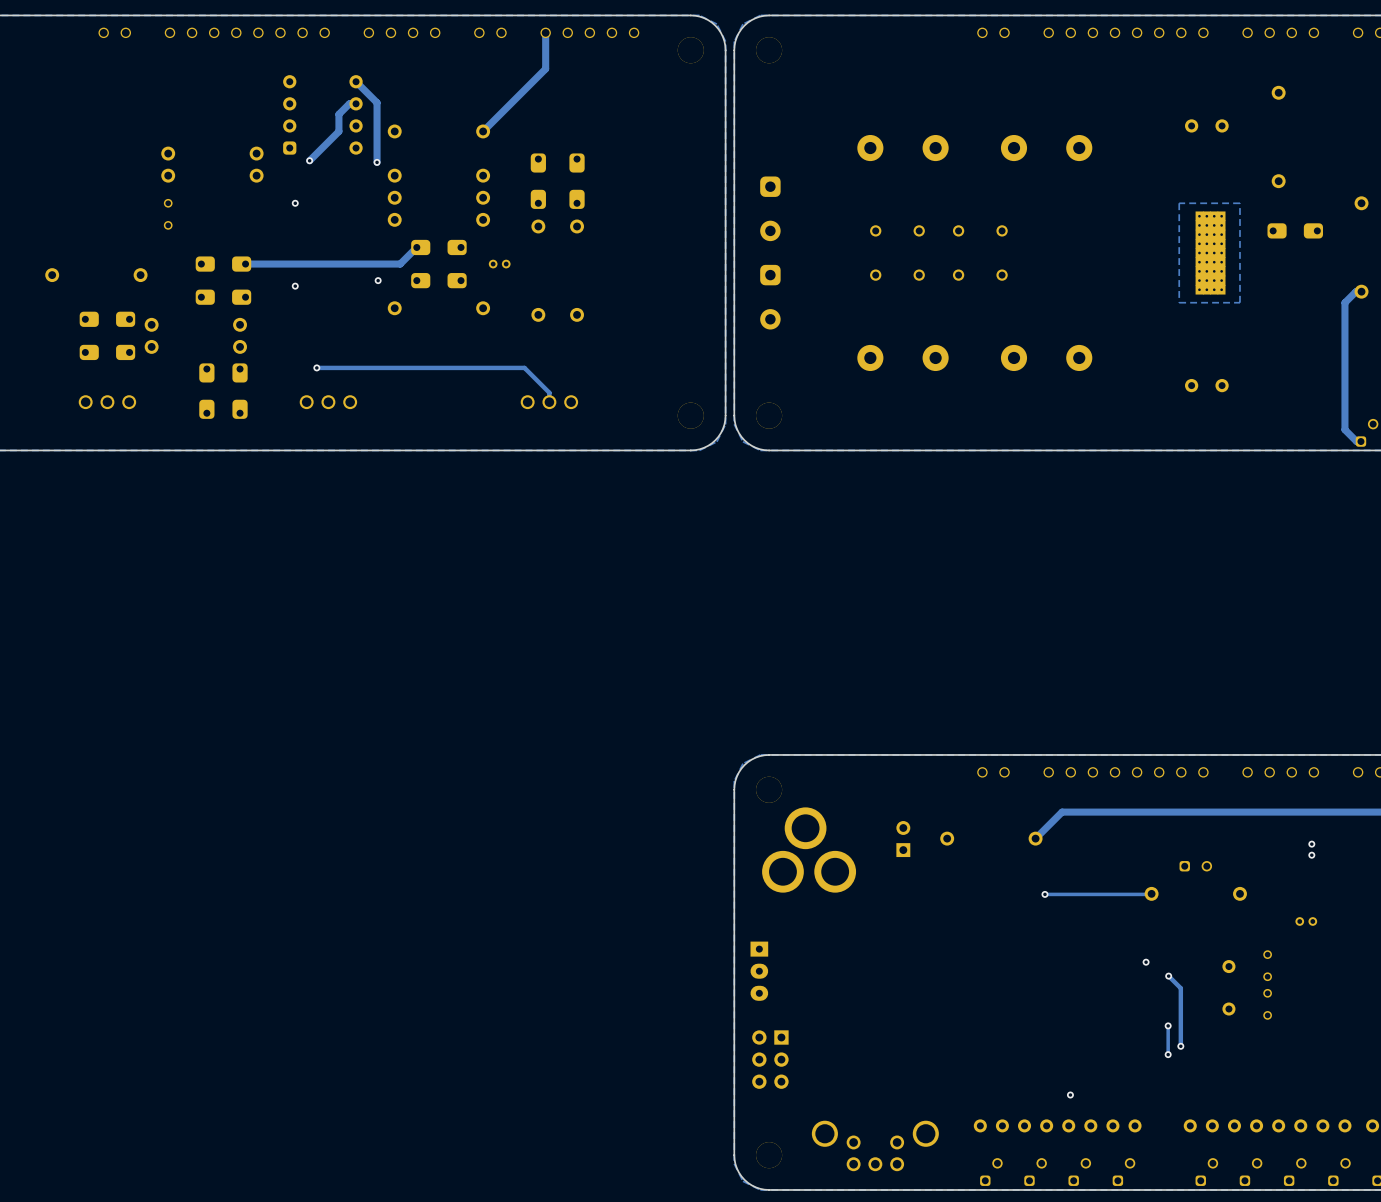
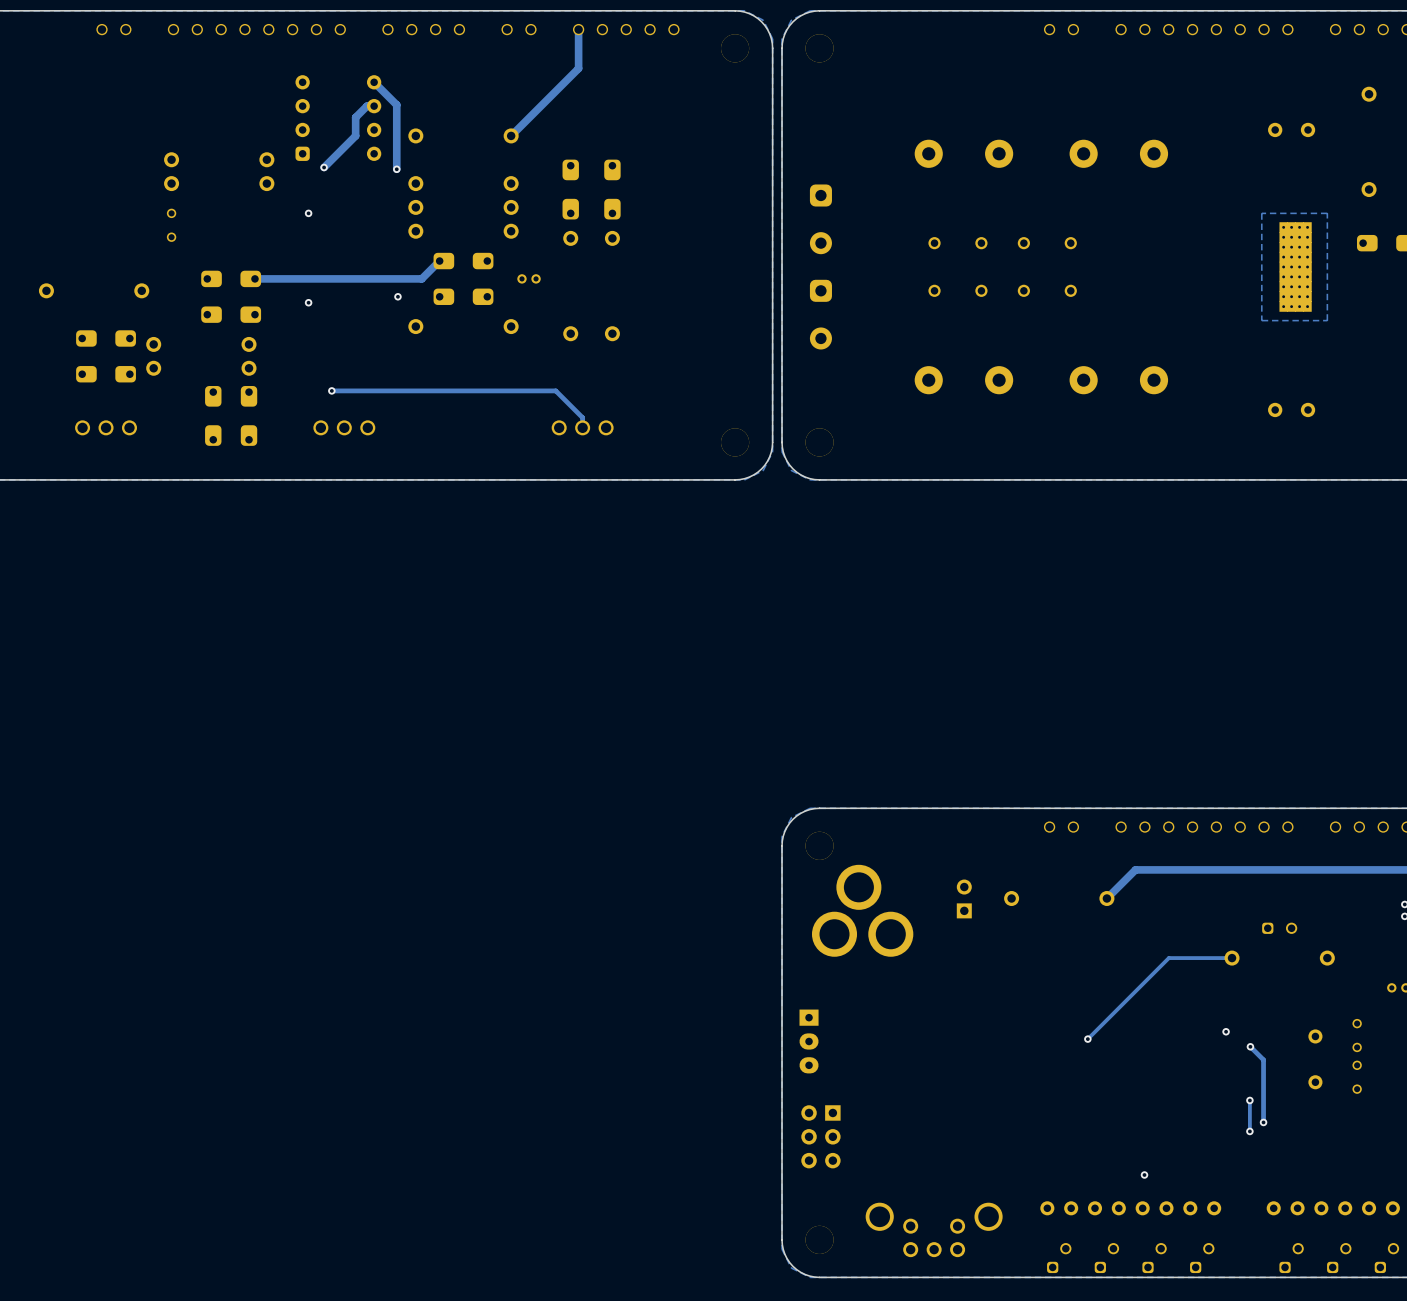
track: (1151, 893) (1044, 894) -> (1232, 958) (1168, 958) (1087, 1039)
via: (1044, 894) -> none
via: none -> (1087, 1039)

